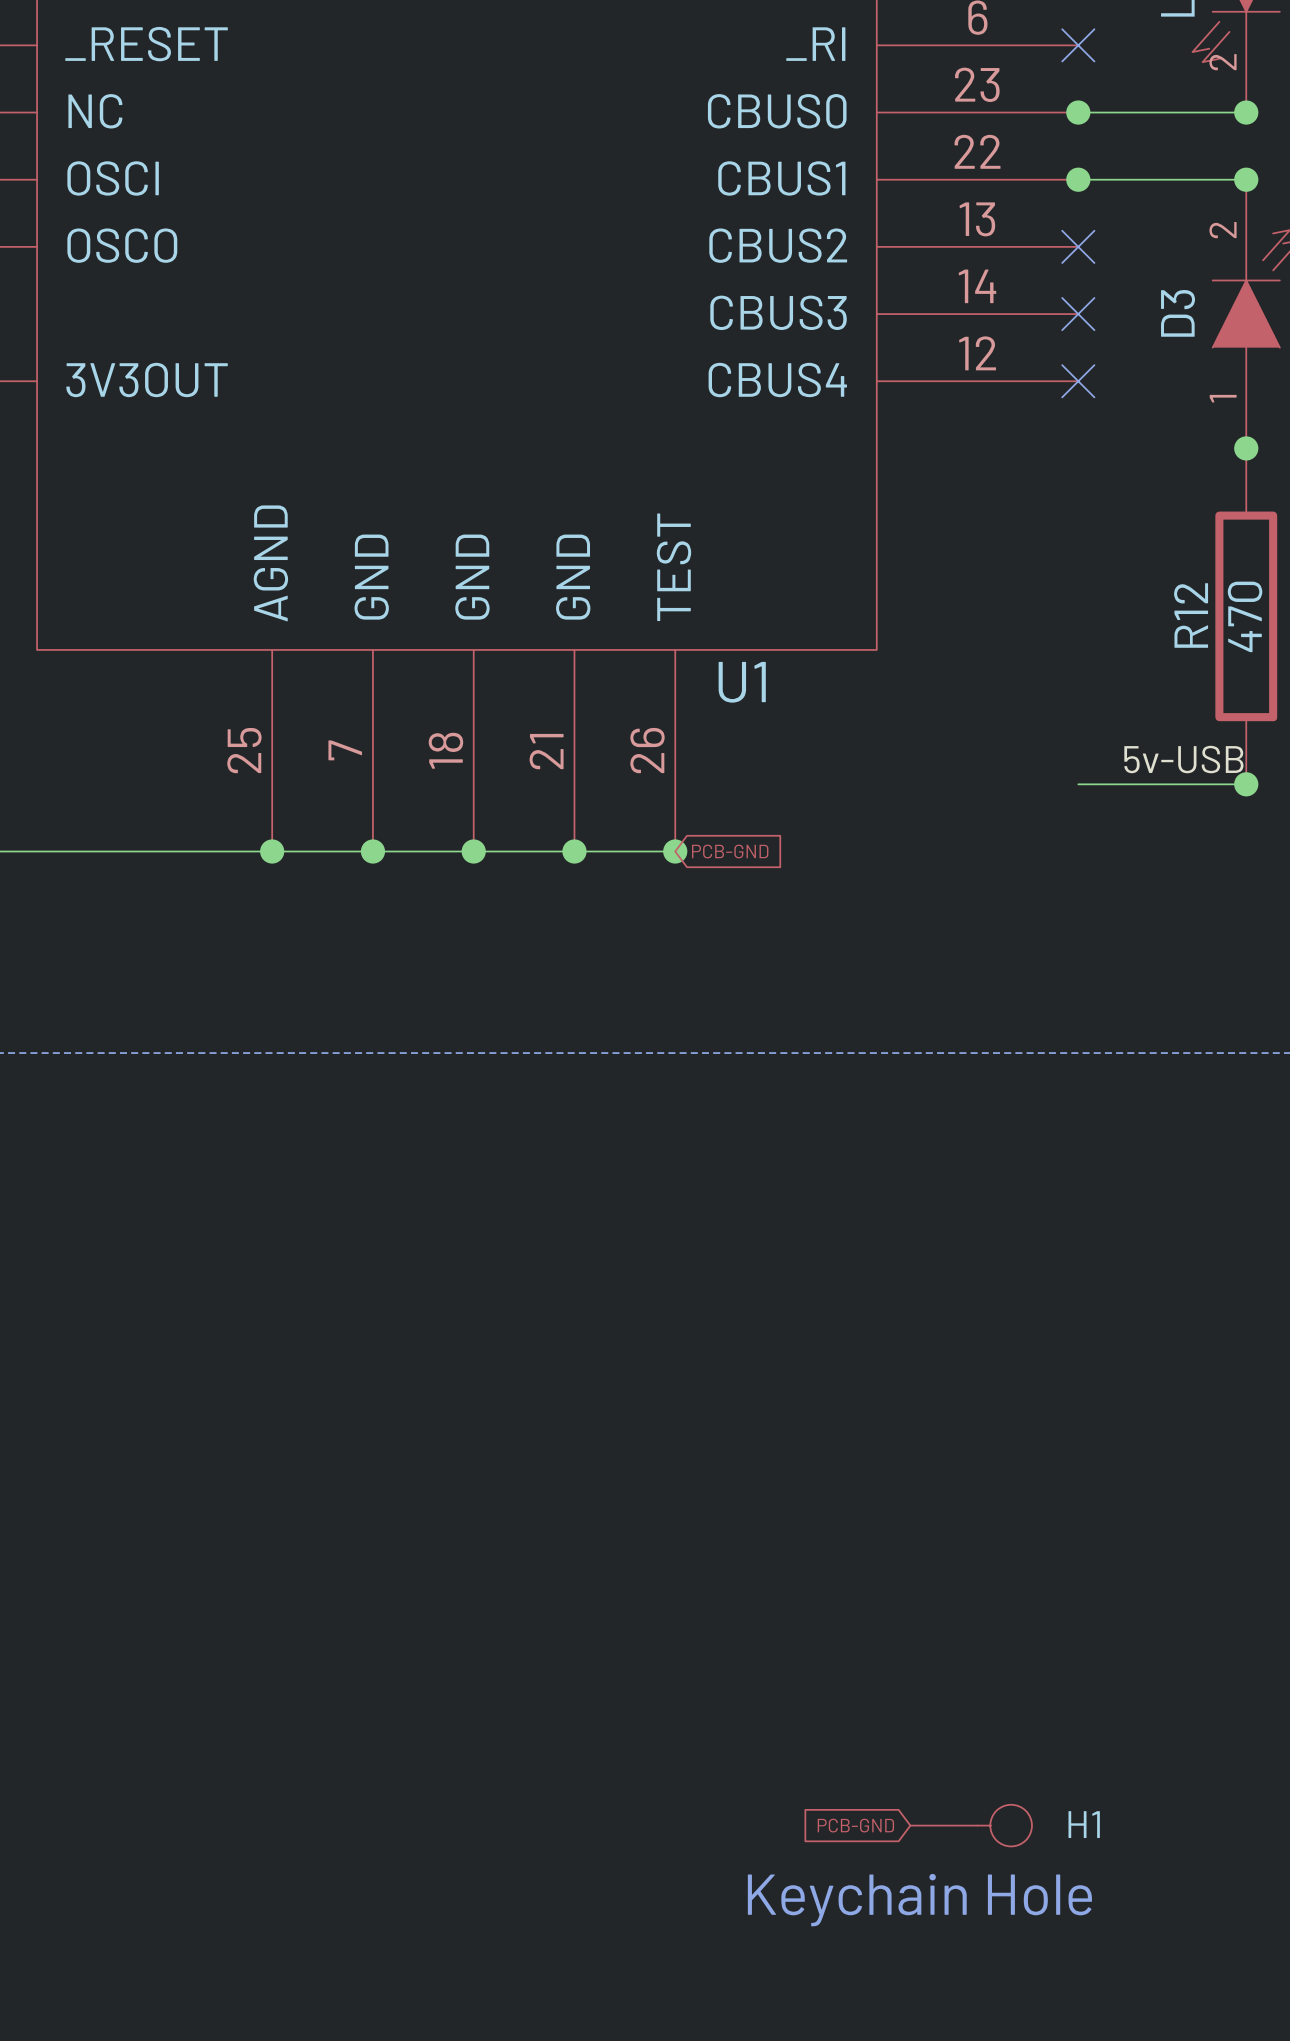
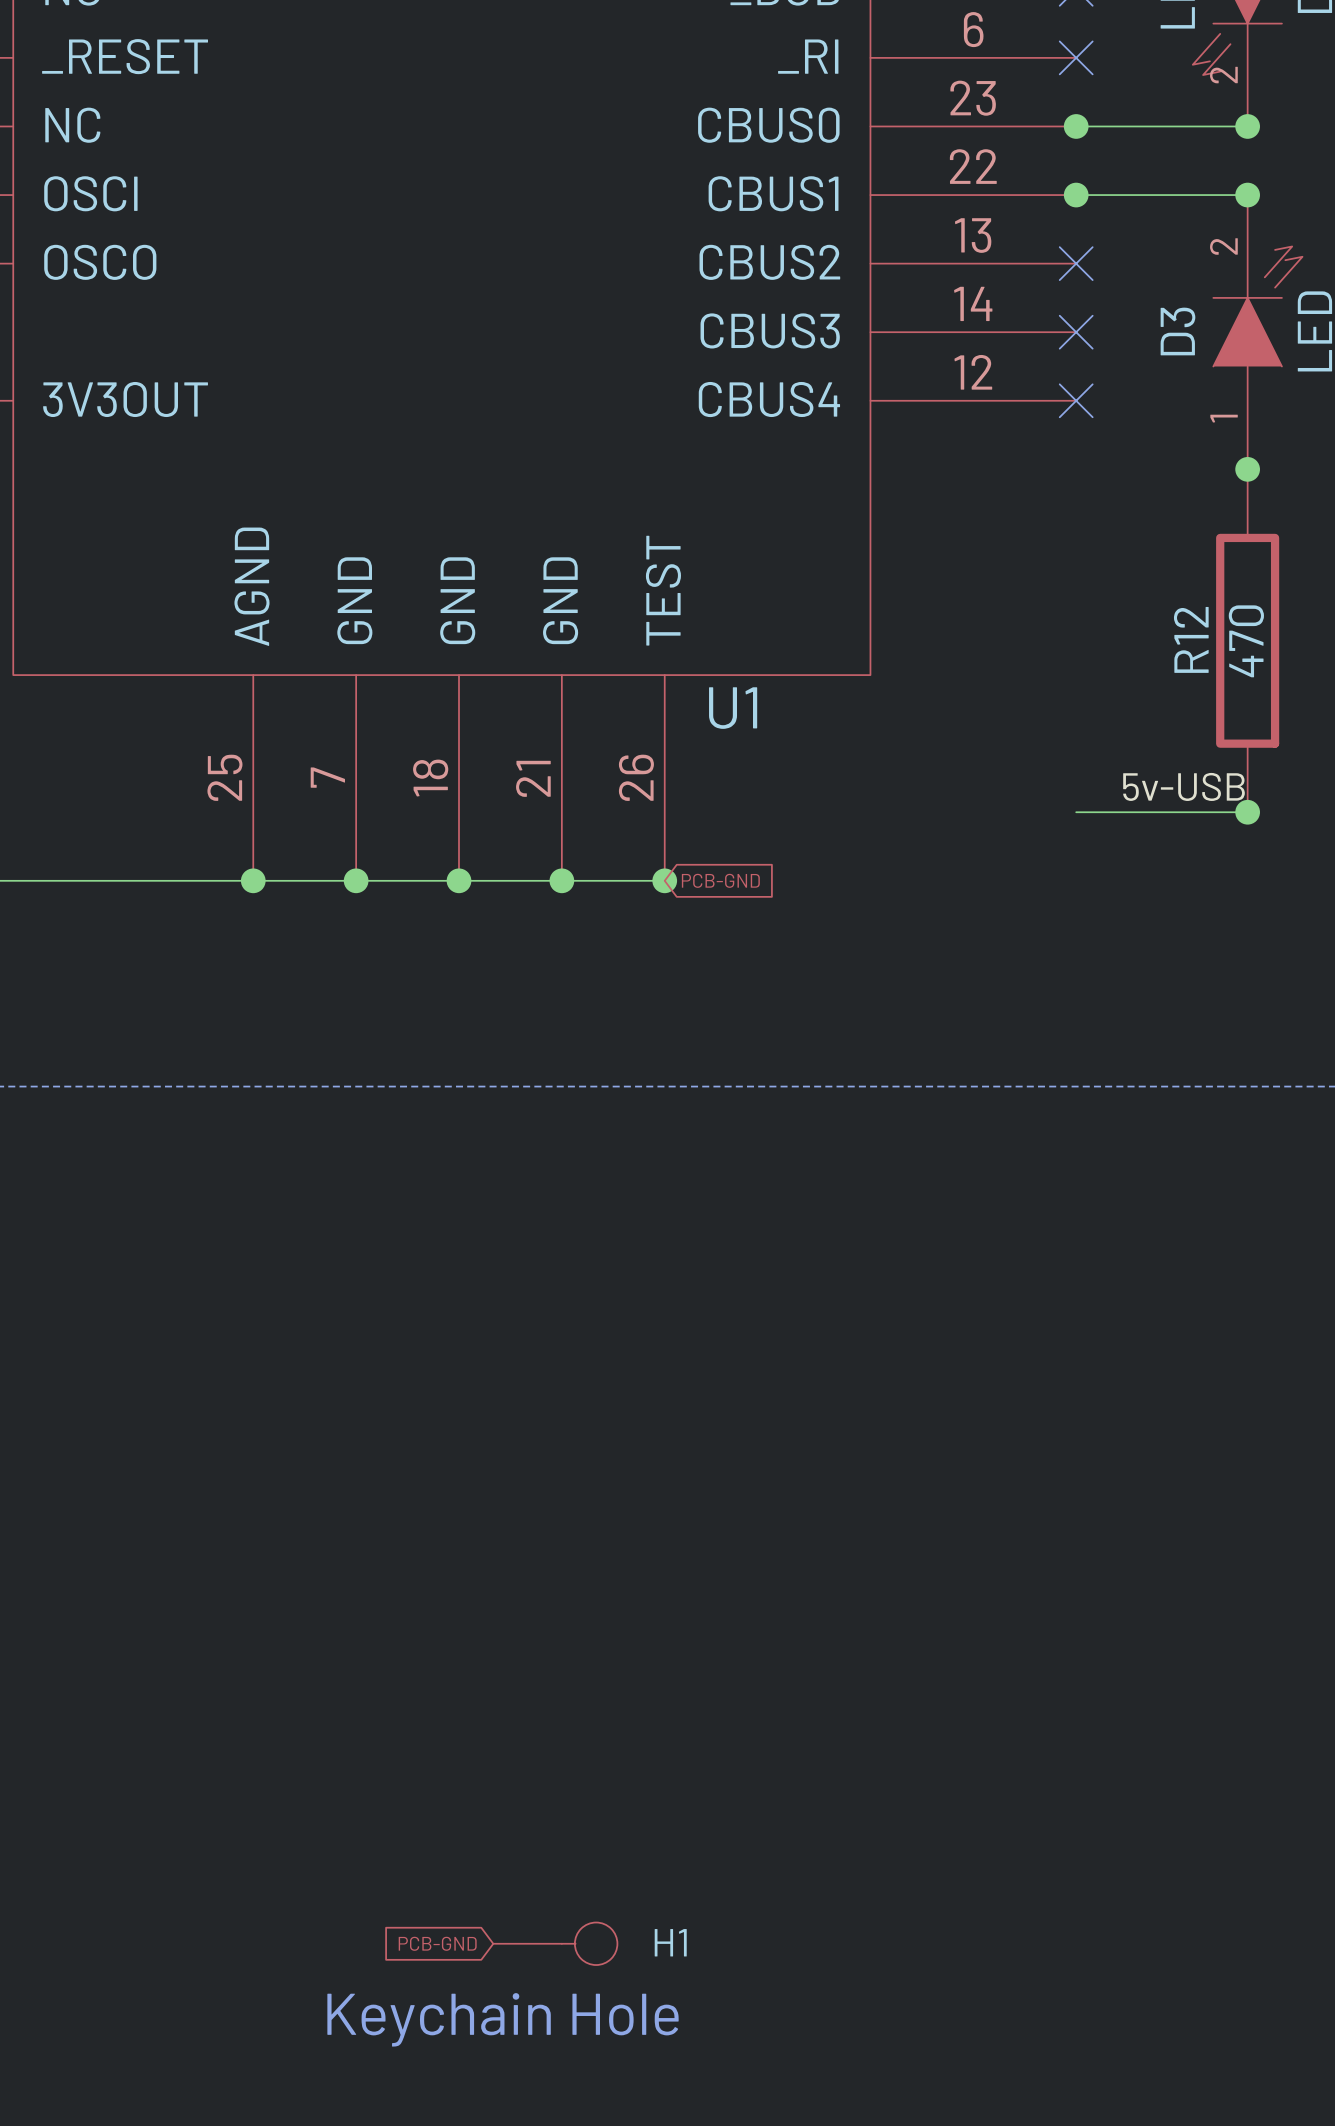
global label position: PCB-GND (855, 1825) -> PCB-GND (437, 1943)
H1 position: (971, 1825) -> (555, 1943)
text position: Keychain Hole (919, 1900) -> Keychain Hole (503, 2019)

